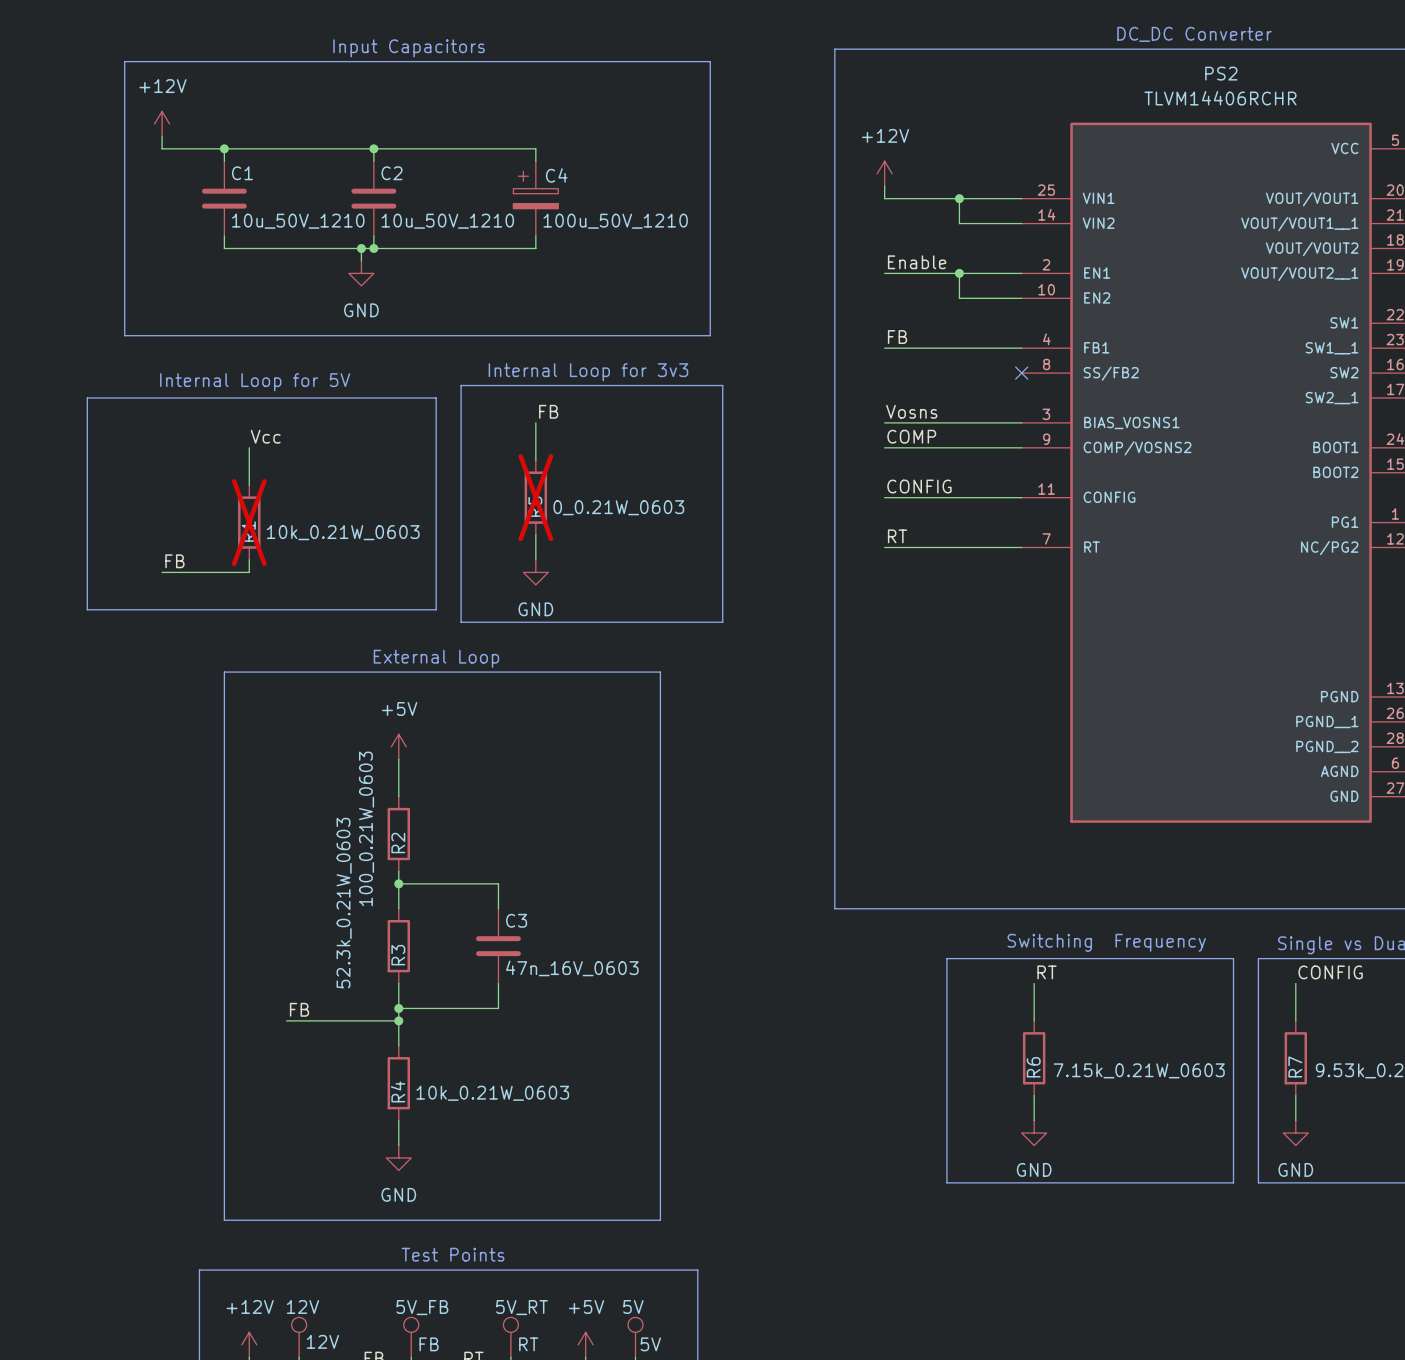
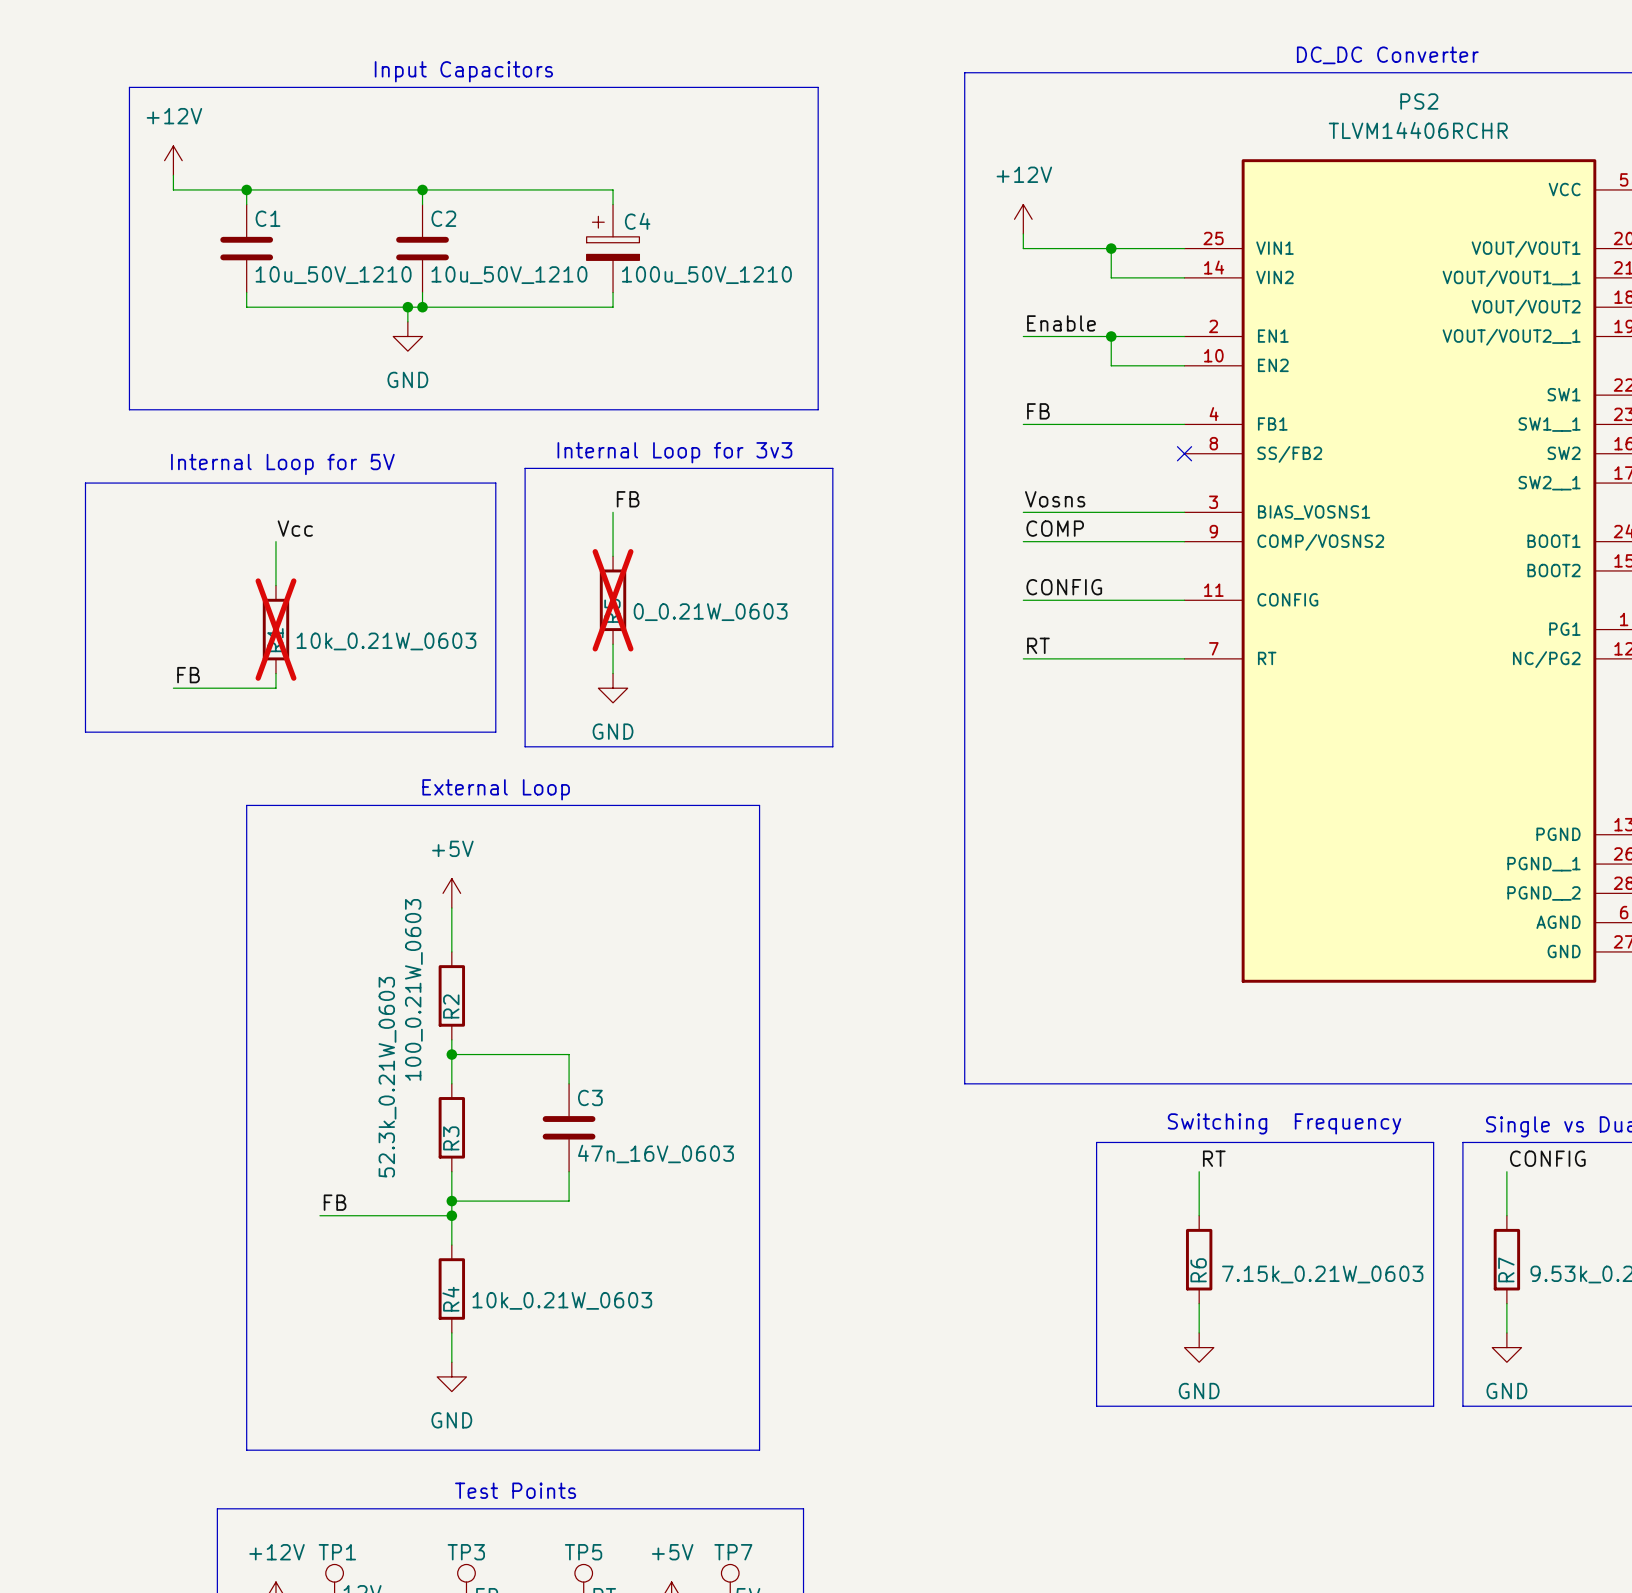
12V name: 12V (302, 1306) -> TP1 (337, 1552)
5V name: 5V (633, 1306) -> TP7 (733, 1552)
5V_FB name: 5V_FB (422, 1307) -> TP3 (466, 1552)
5V_RT name: 5V_RT (522, 1307) -> TP5 (583, 1552)

